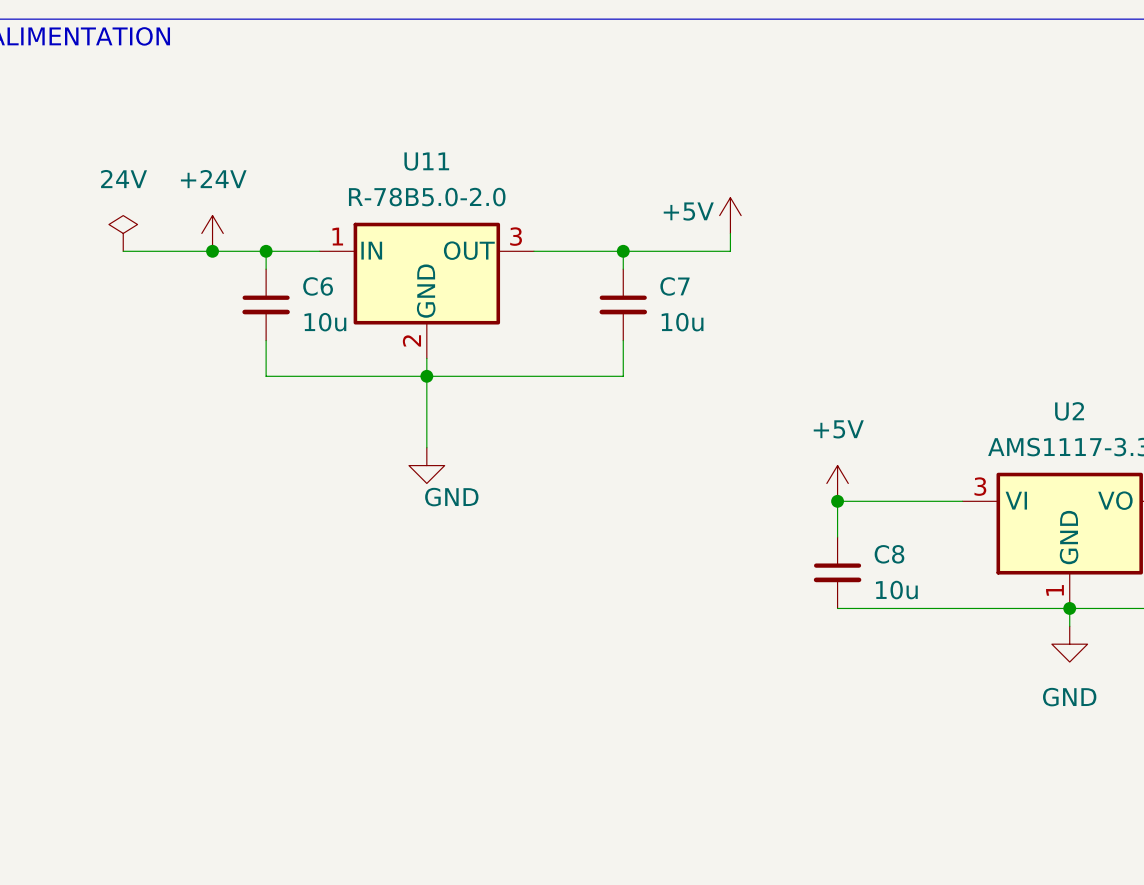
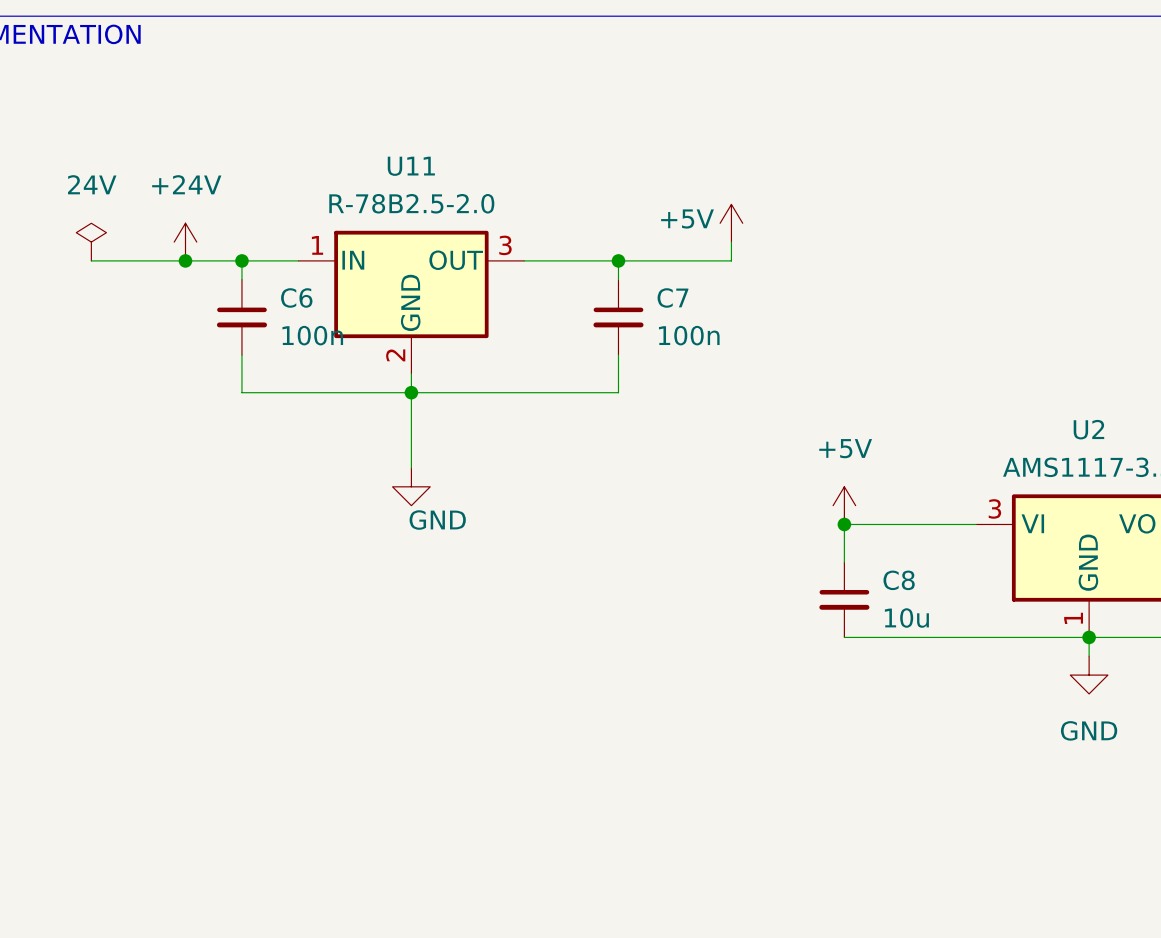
U11 value: R-78B5.0-2.0 (427, 197) -> R-78B2.5-2.0 (411, 203)
C6 value: 10u (325, 322) -> 100n (312, 335)
C7 value: 10u (682, 322) -> 100n (689, 335)

